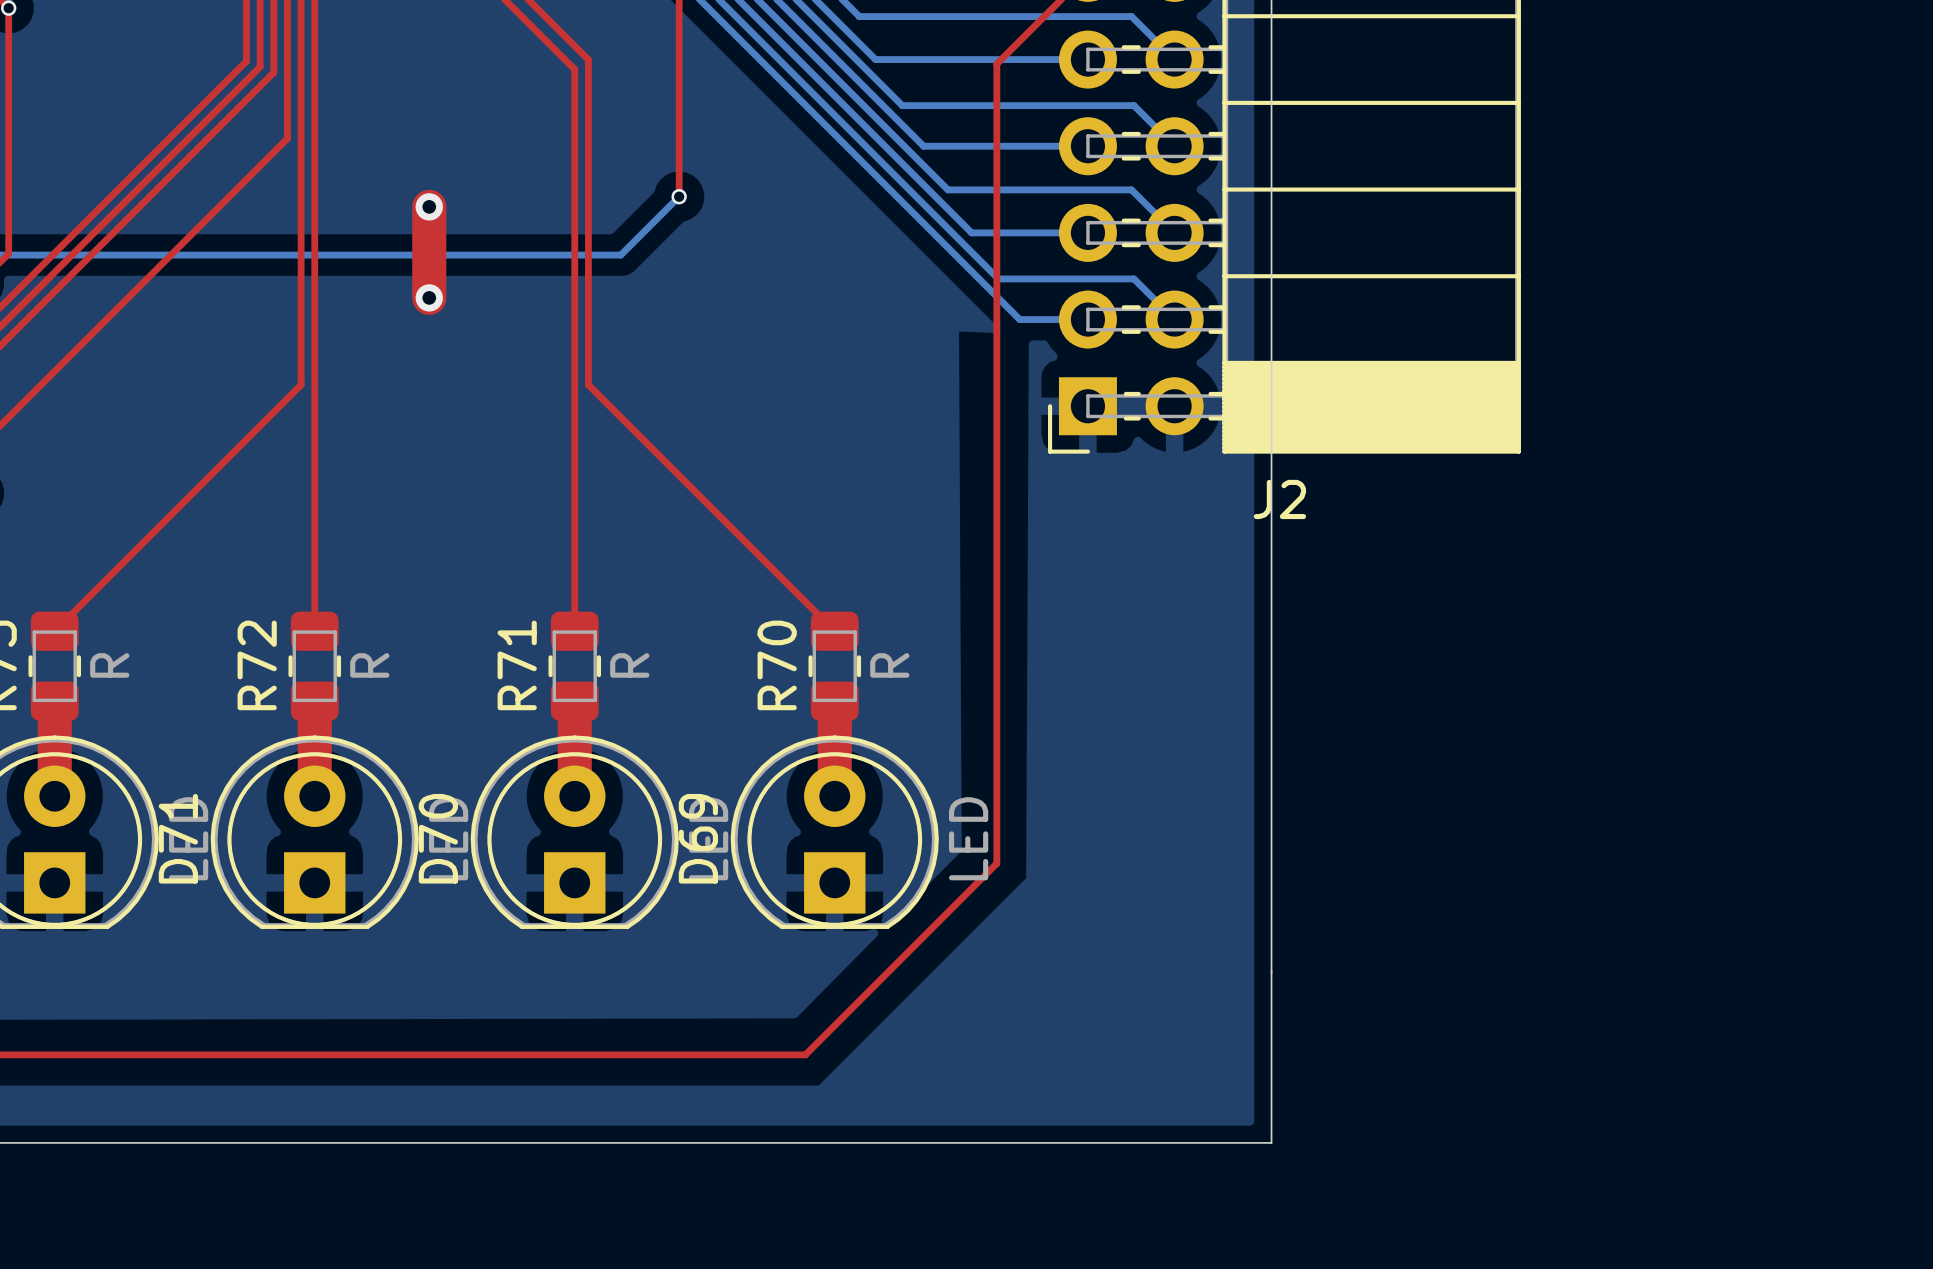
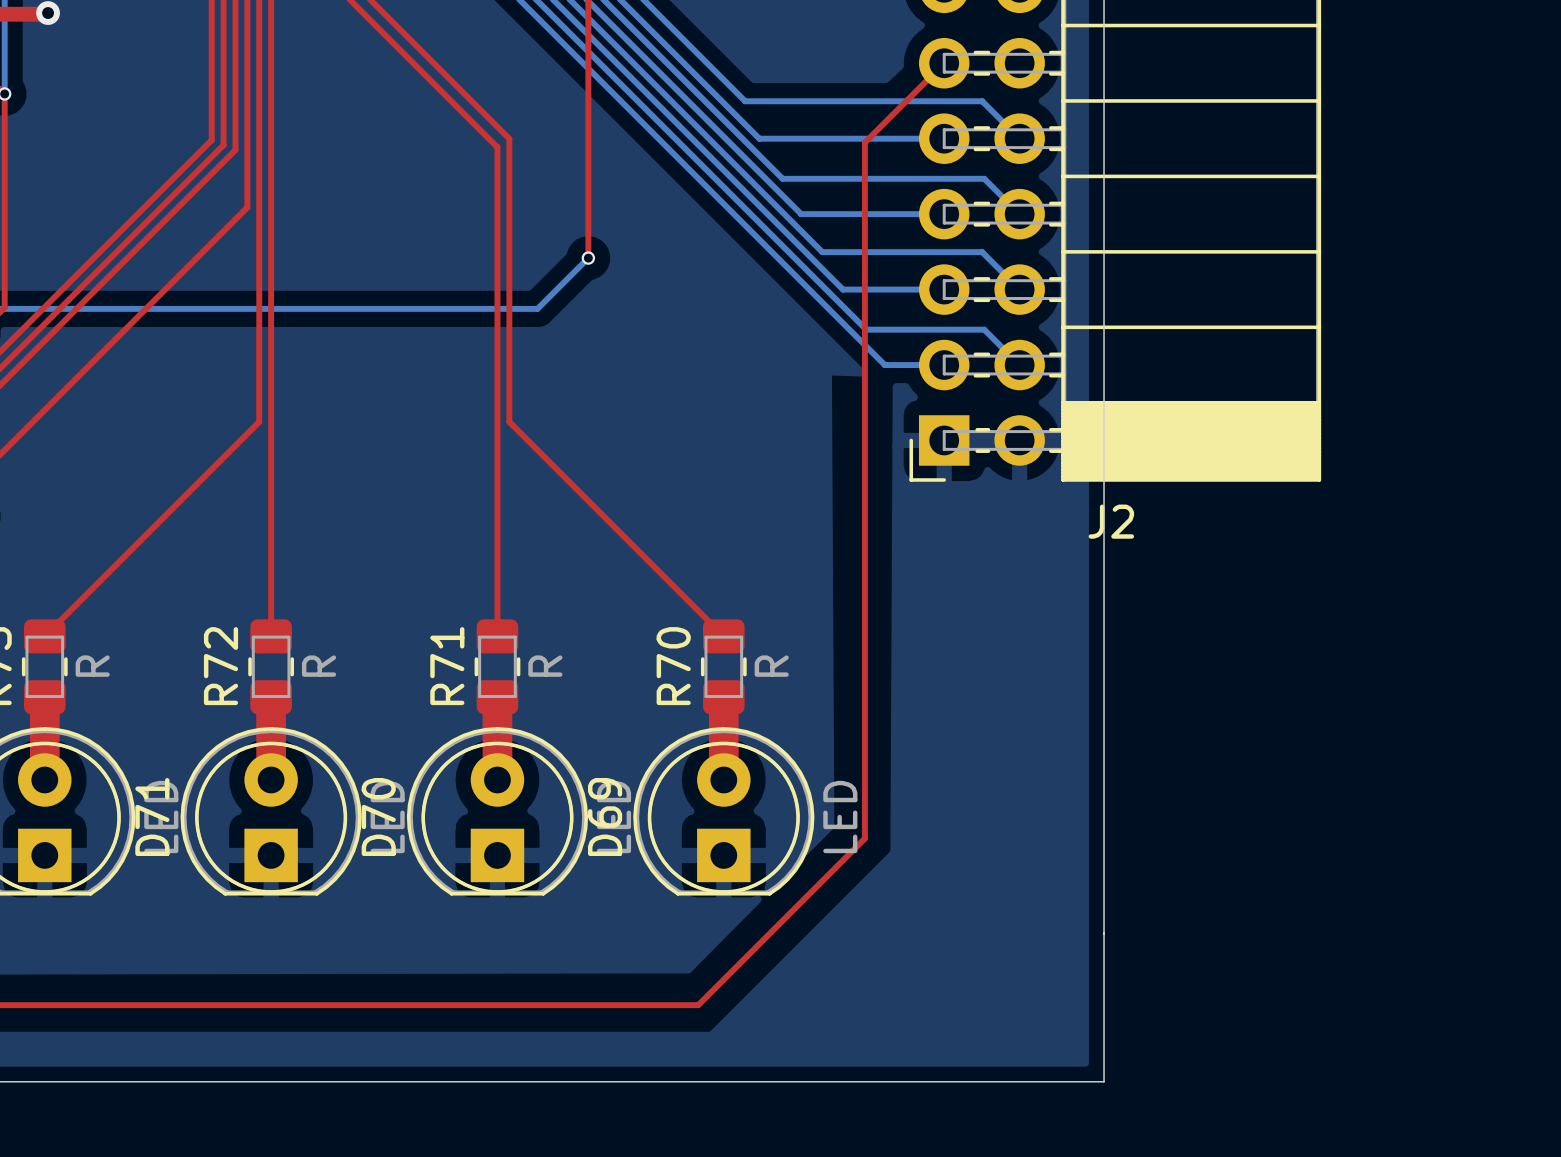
top track: (429, 206) (429, 297) -> none
via: (429, 206) -> none
via: (429, 297) -> none

